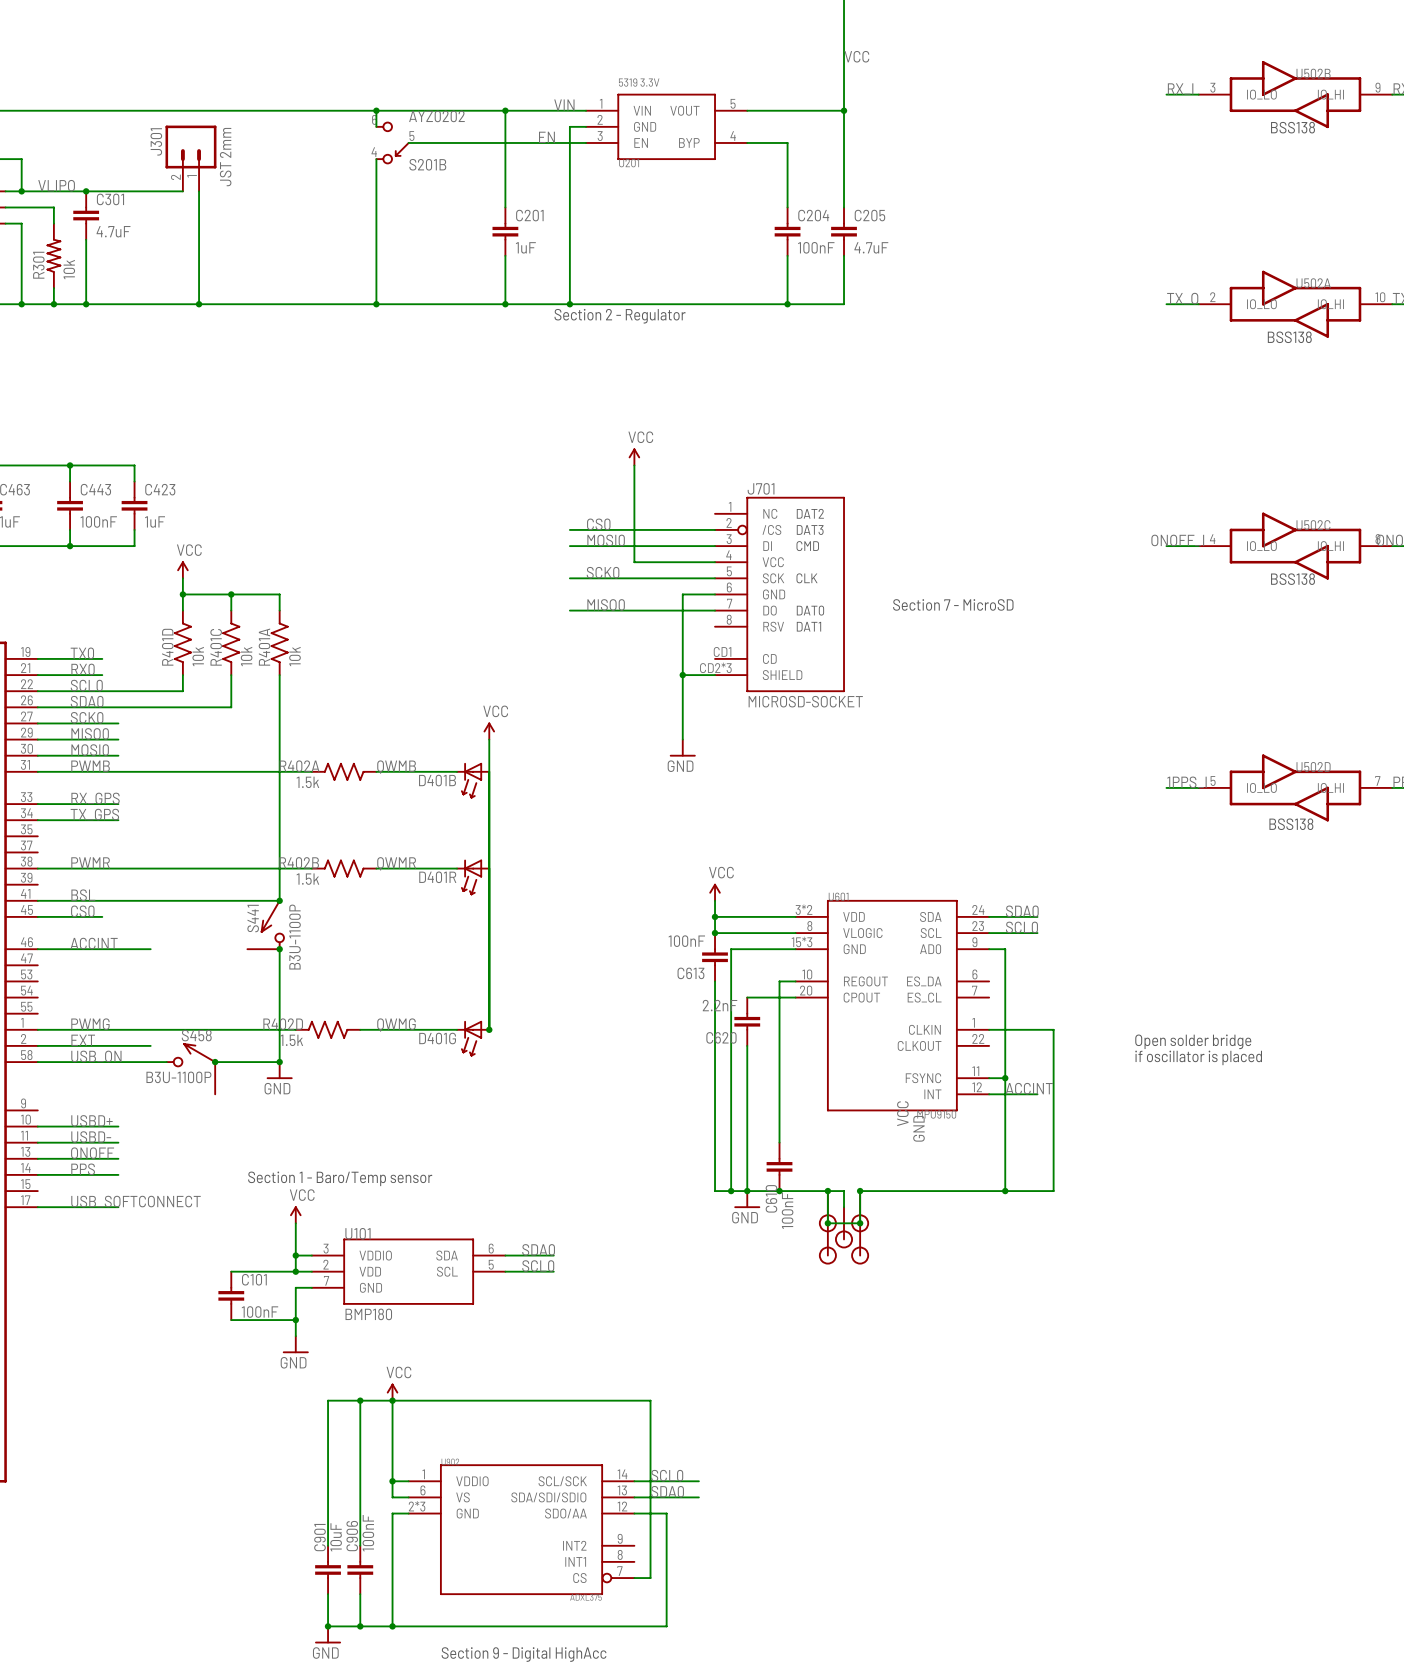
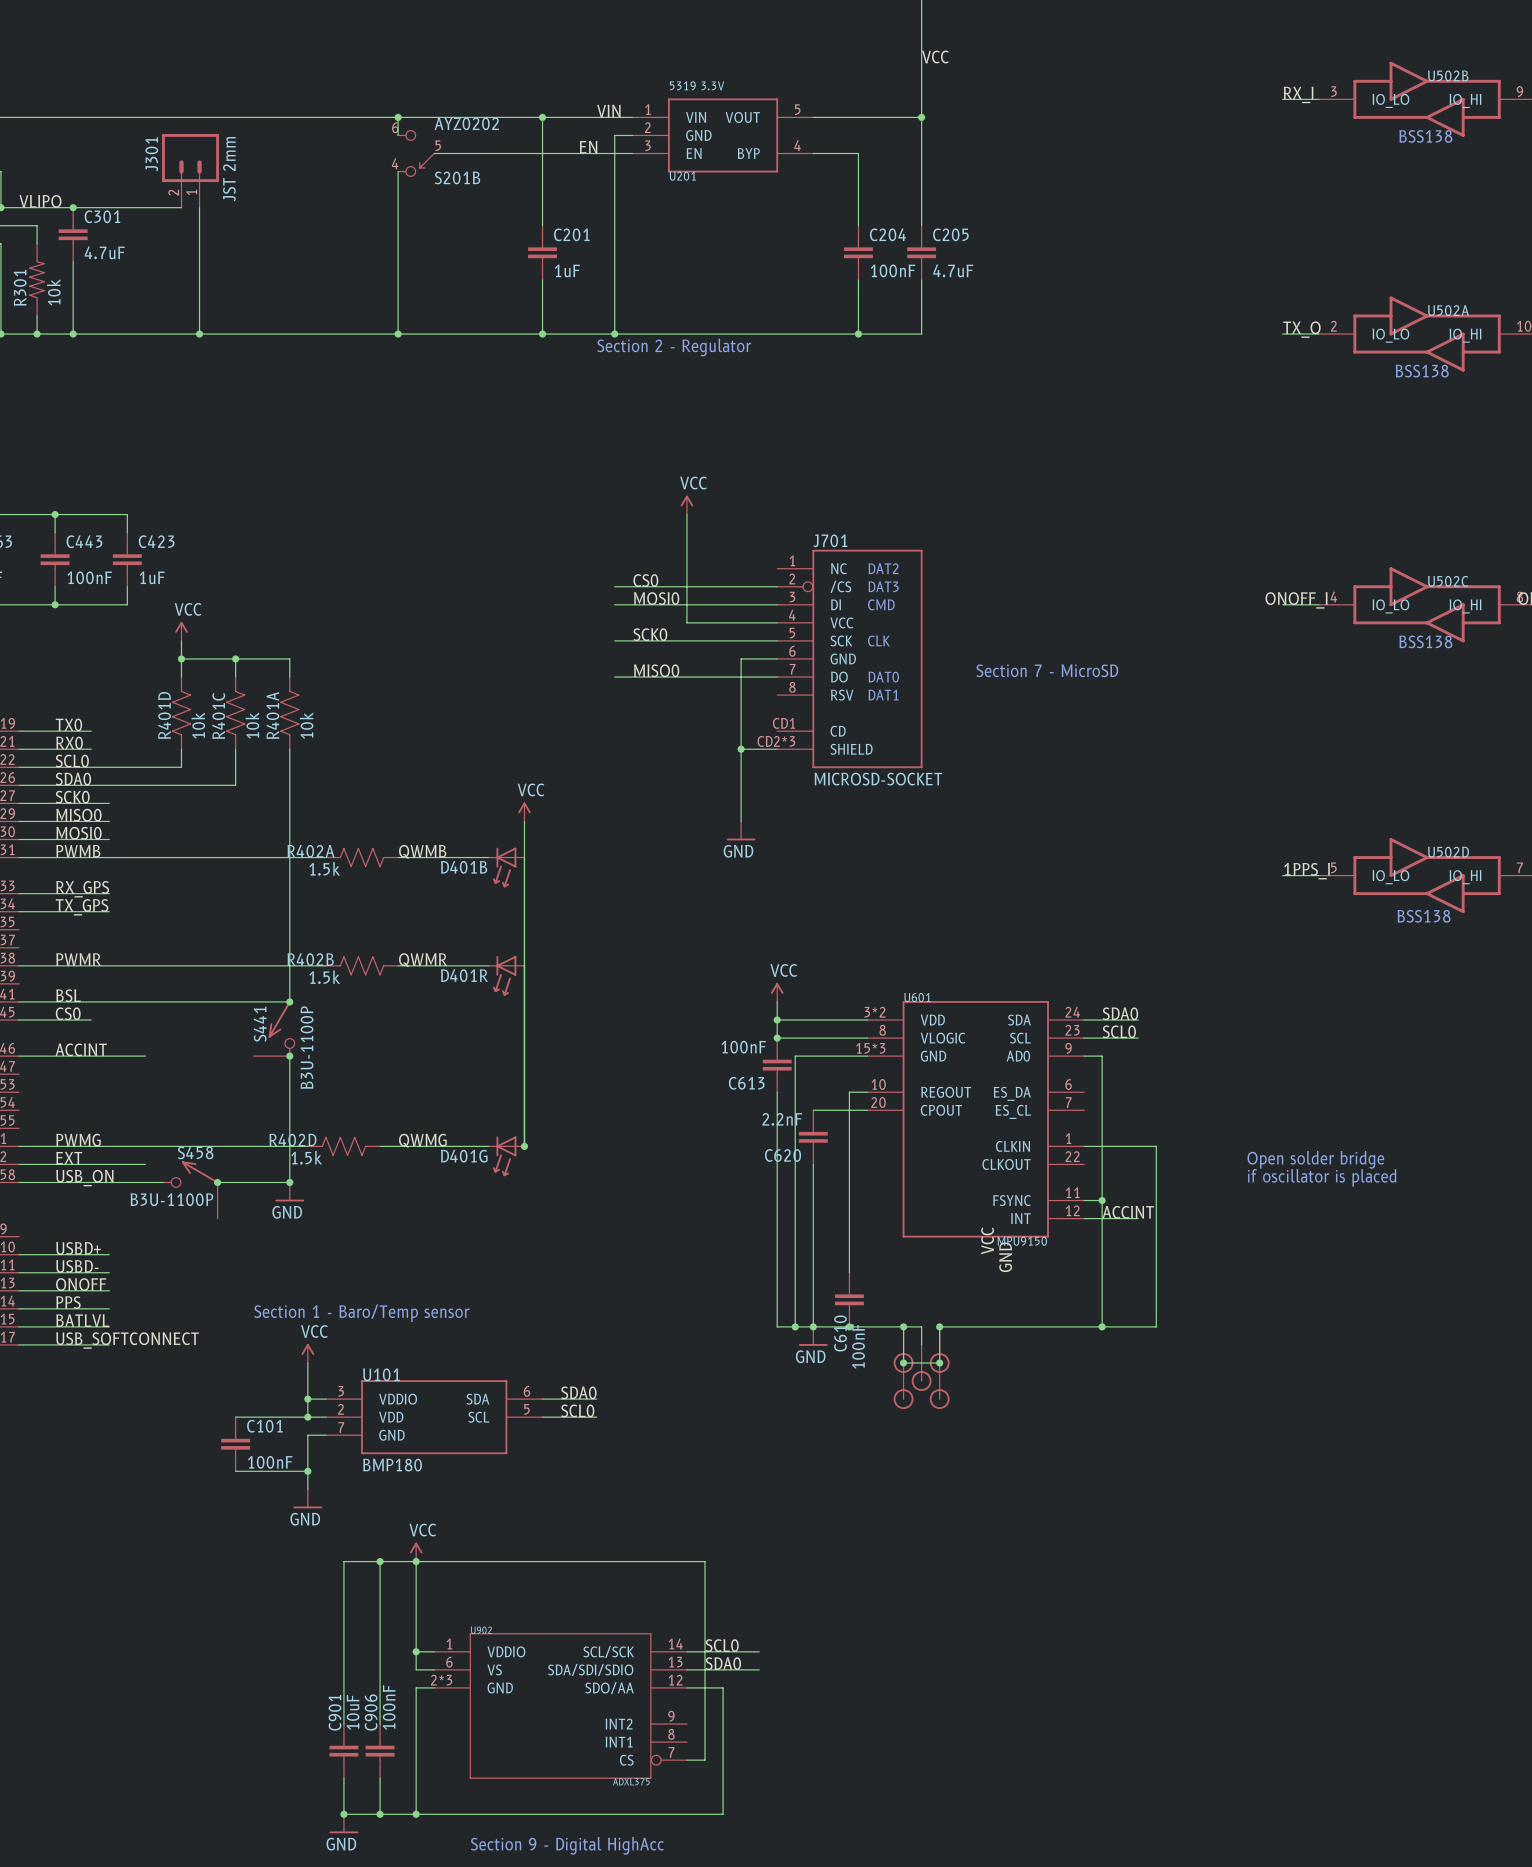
label: none -> BATLVL (82, 1320)
wire: none -> (19, 1326) (109, 1326)

